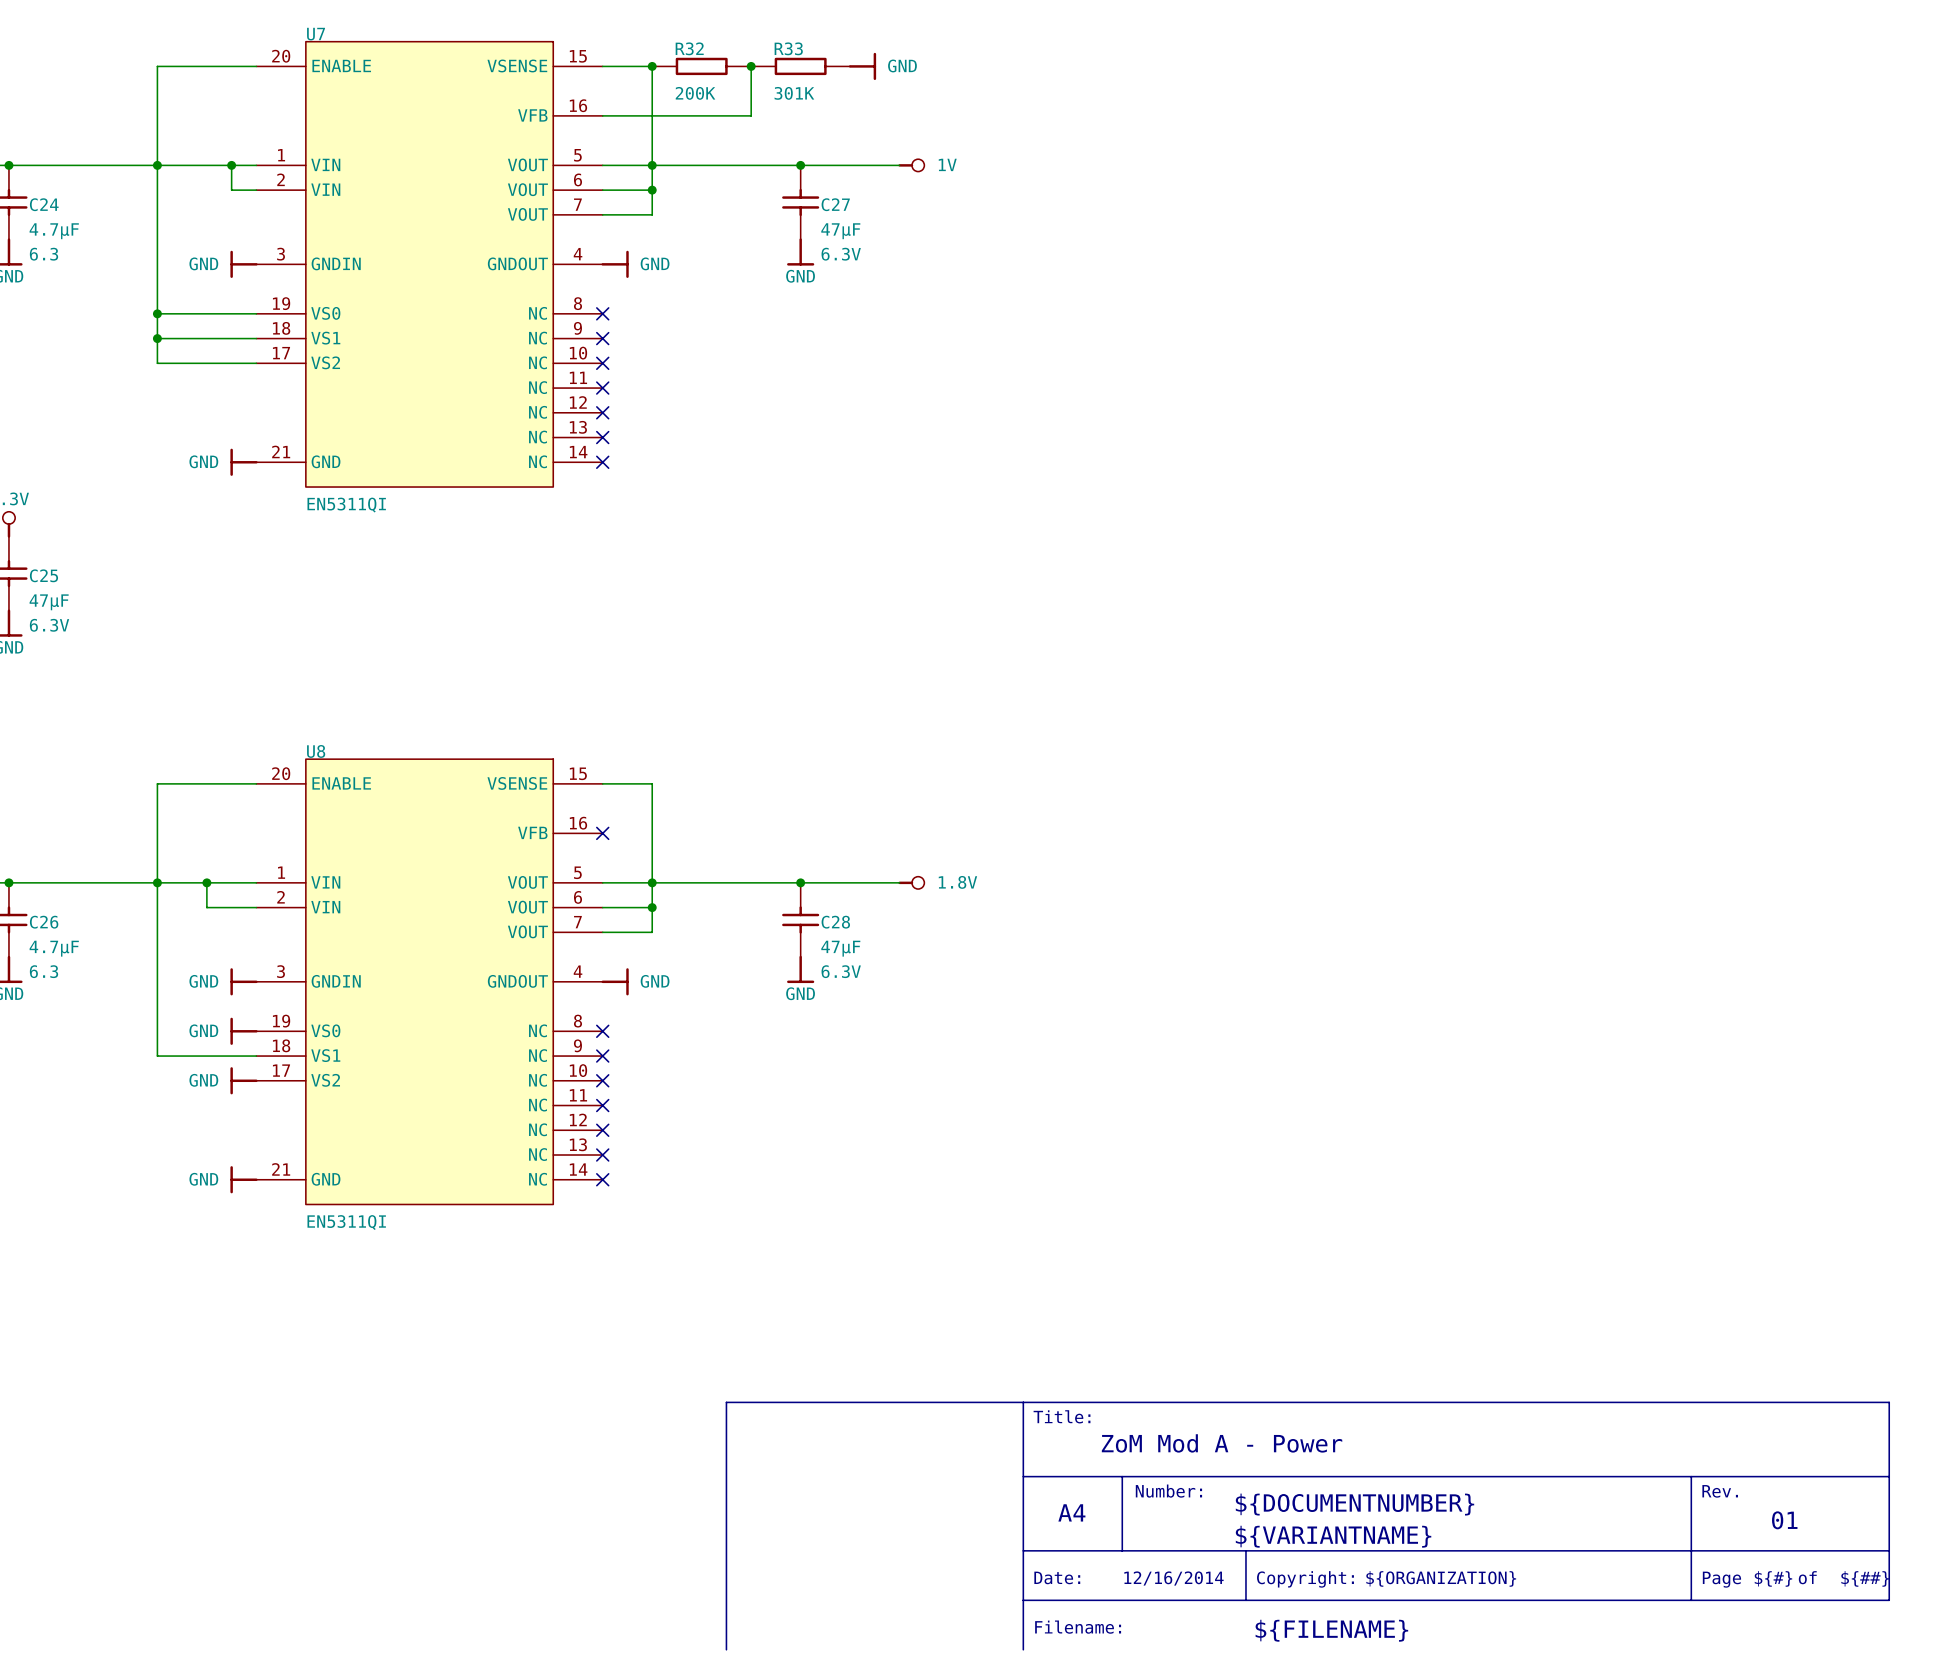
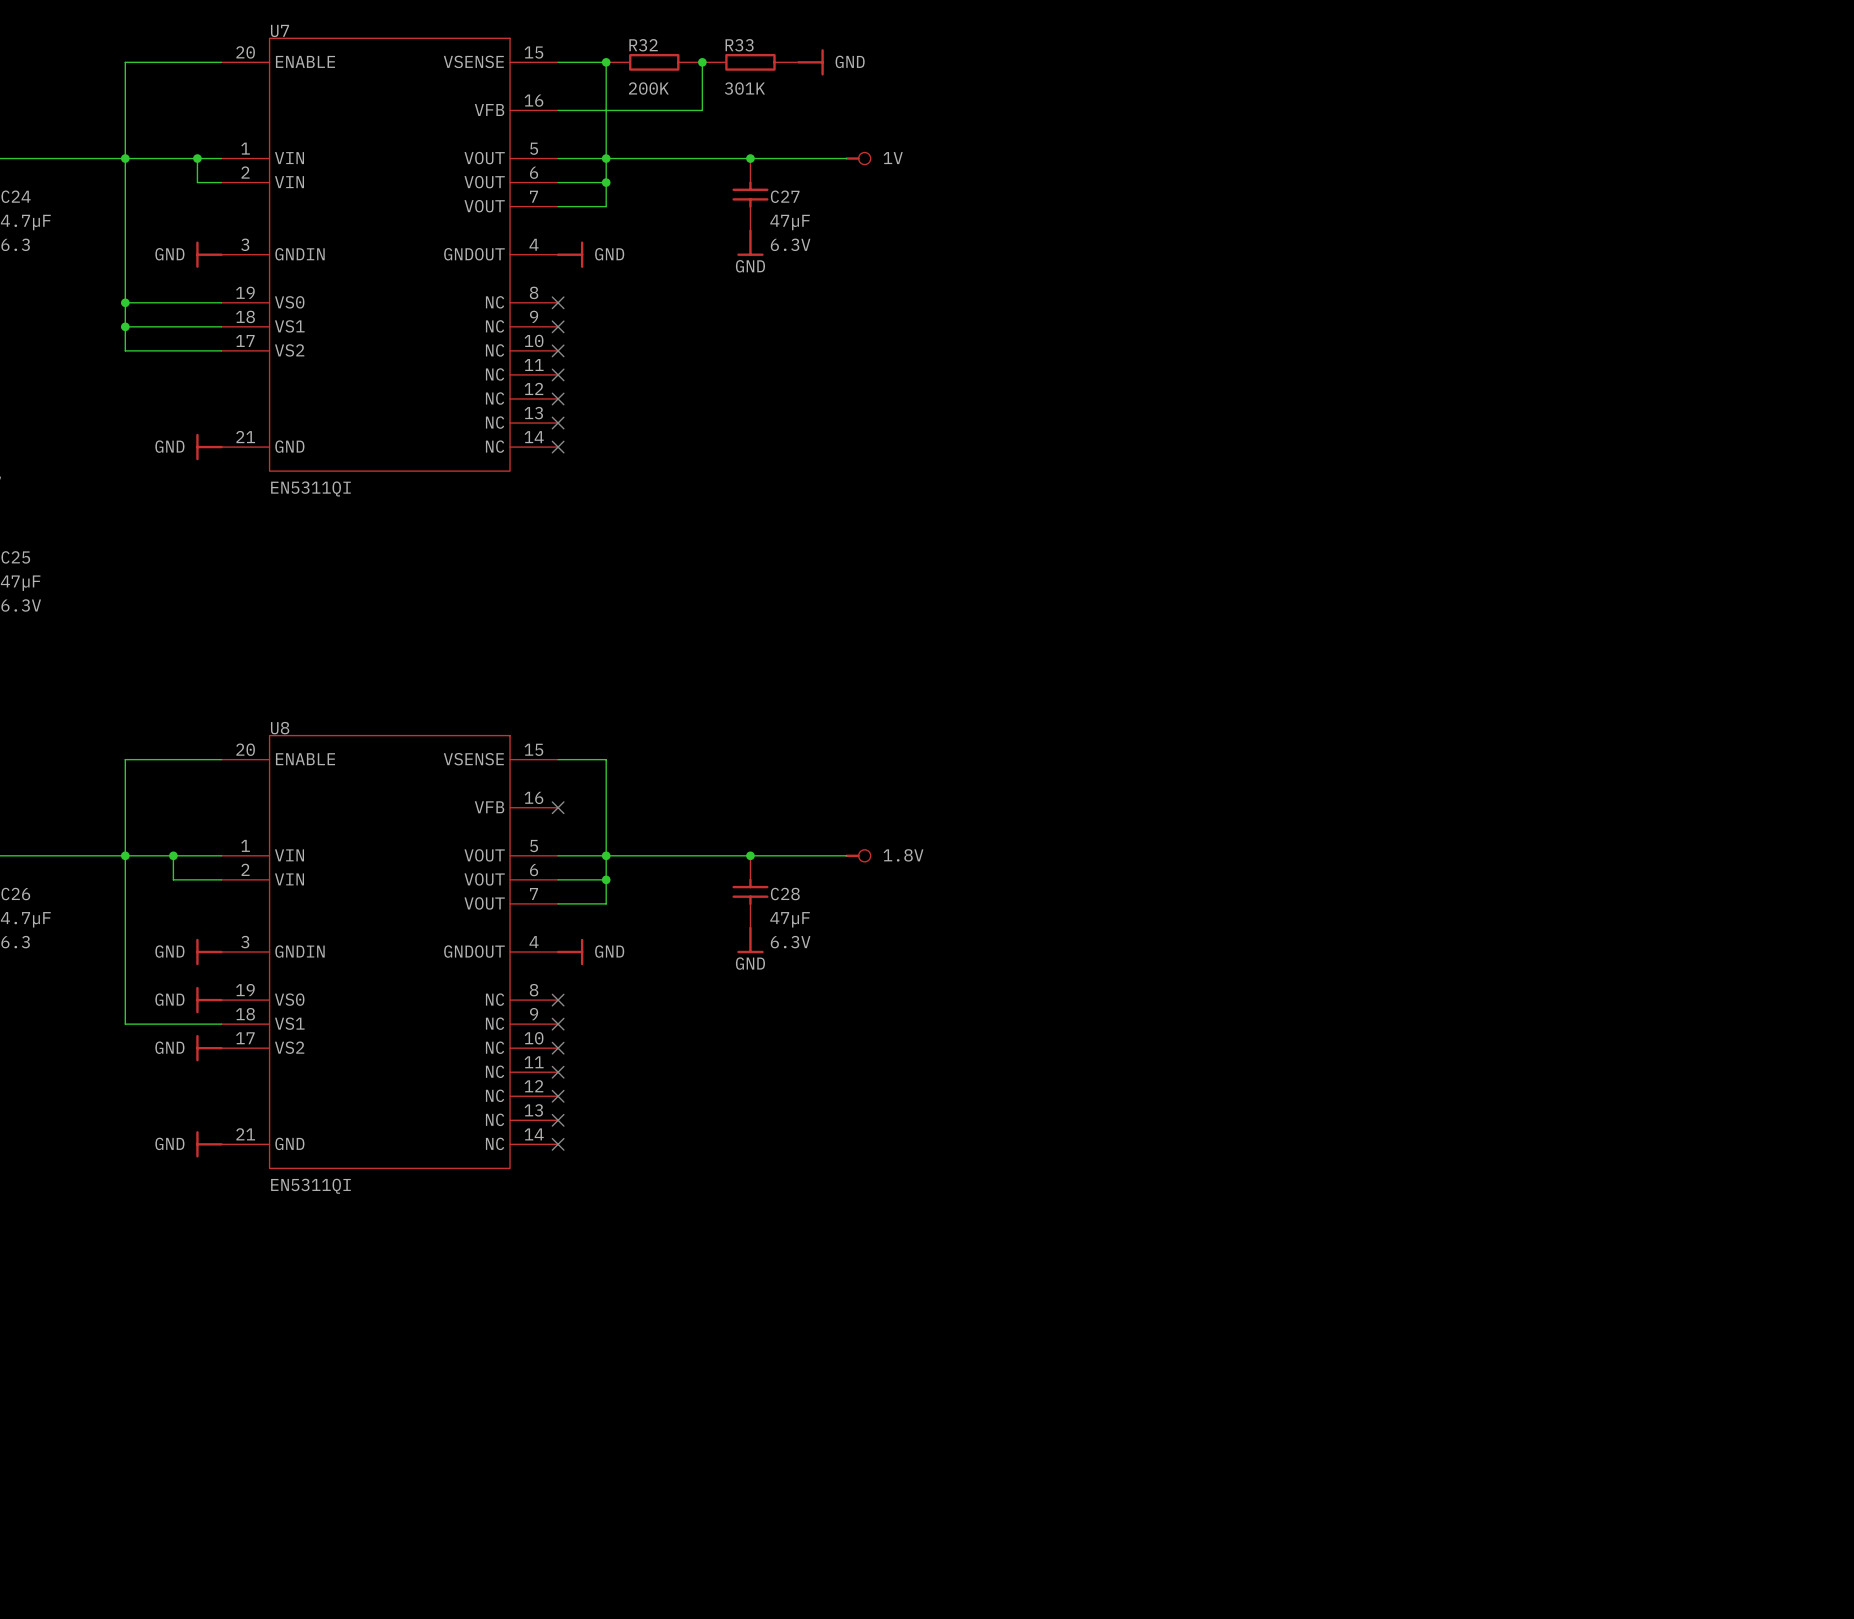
line: (1023, 1402) (1023, 1649) -> none
text: Title: (1062, 1416) -> none
text: ZoM Mod A - Power (1222, 1443) -> none
line: (1023, 1476) (1889, 1476) -> none
line: (1122, 1476) (1122, 1550) -> none
line: (1691, 1476) (1691, 1600) -> none
text: Number: (1168, 1491) -> none
text: Rev. (1720, 1491) -> none
text: ${DOCUMENTNUMBER} (1354, 1504) -> none
text: A4 (1071, 1512) -> none
text: 01 (1784, 1520) -> none
text: ${VARIANTNAME} (1333, 1536) -> none
line: (1023, 1550) (1889, 1550) -> none
line: (1245, 1550) (1245, 1600) -> none
text: Date: (1057, 1577) -> none
text: of (1807, 1577) -> none
text: 12/16/2014 (1173, 1578) -> none
text: ${ORGANIZATION} (1441, 1578) -> none
text: ${#} (1773, 1578) -> none
text: ${##} (1865, 1578) -> none
text: Copyright: (1305, 1579) -> none
text: Page (1721, 1579) -> none
line: (1023, 1600) (1889, 1600) (1889, 1402) (726, 1402) (726, 1649) -> none
text: Filename: (1078, 1627) -> none
text: ${FILENAME} (1331, 1630) -> none

